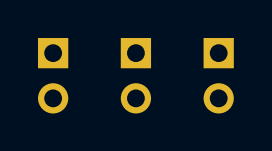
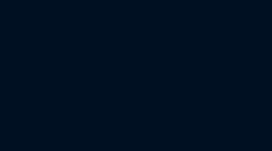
part: (53, 75) -> none
part: (135, 75) -> none
part: (218, 75) -> none

